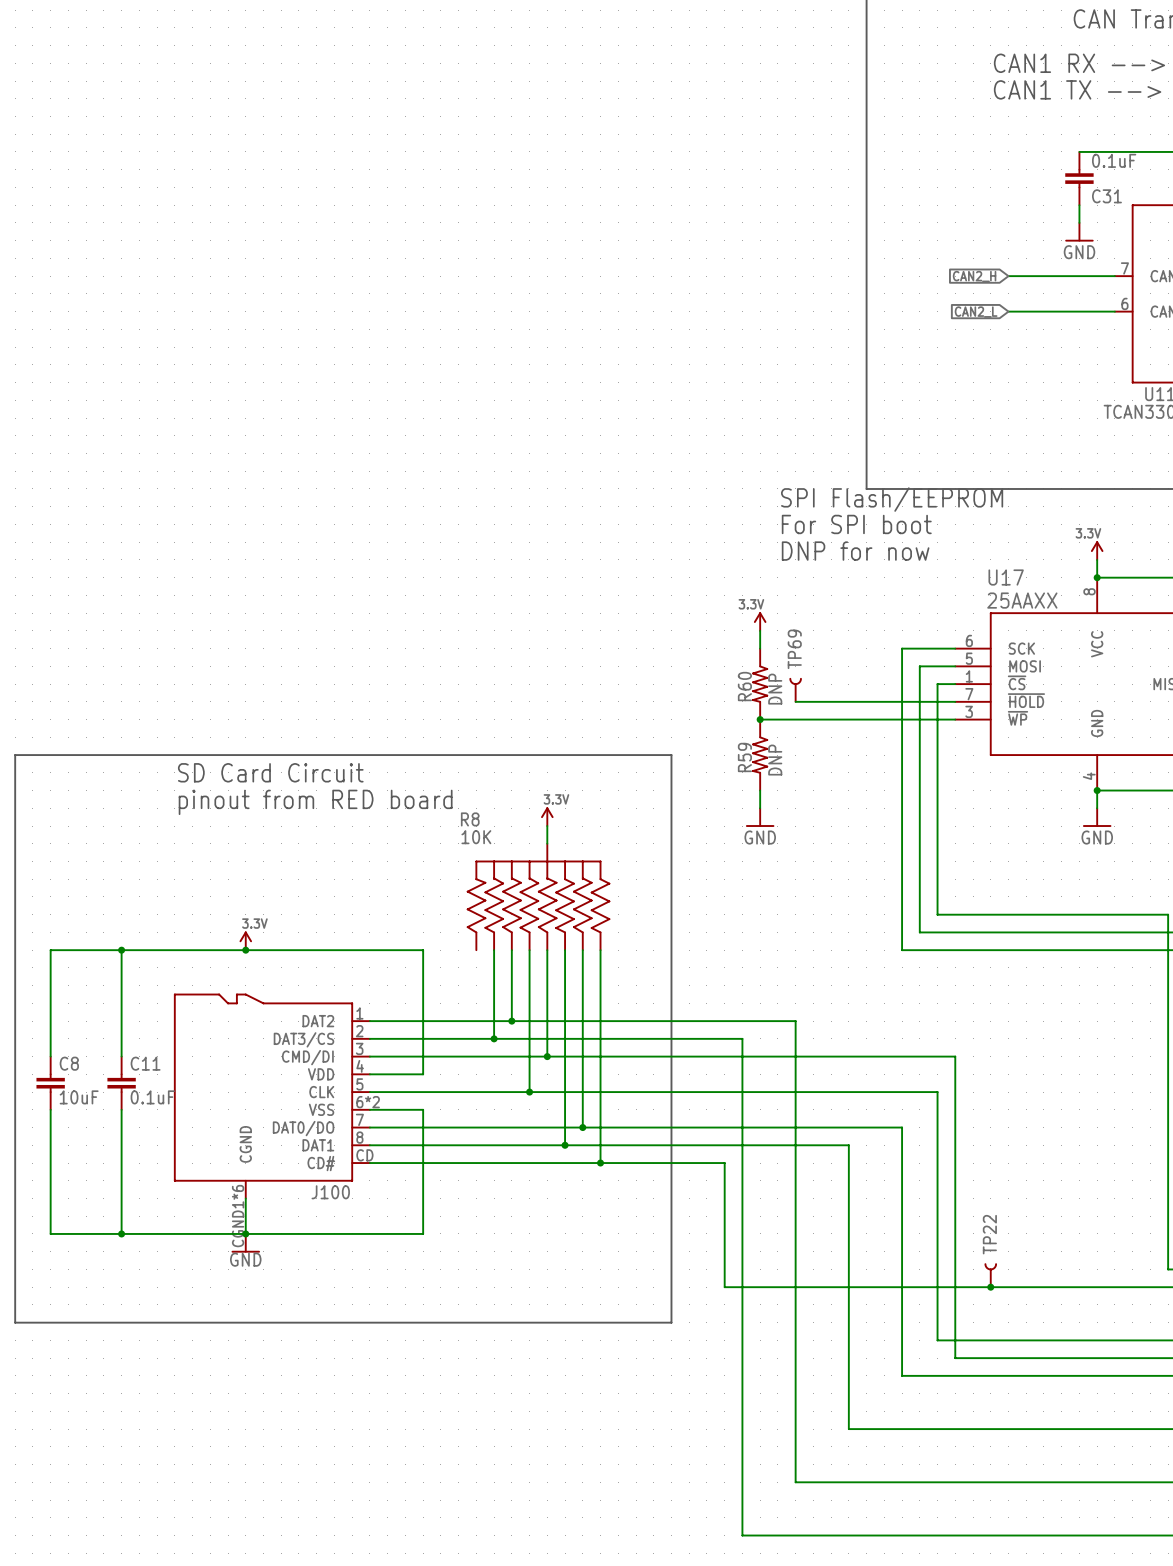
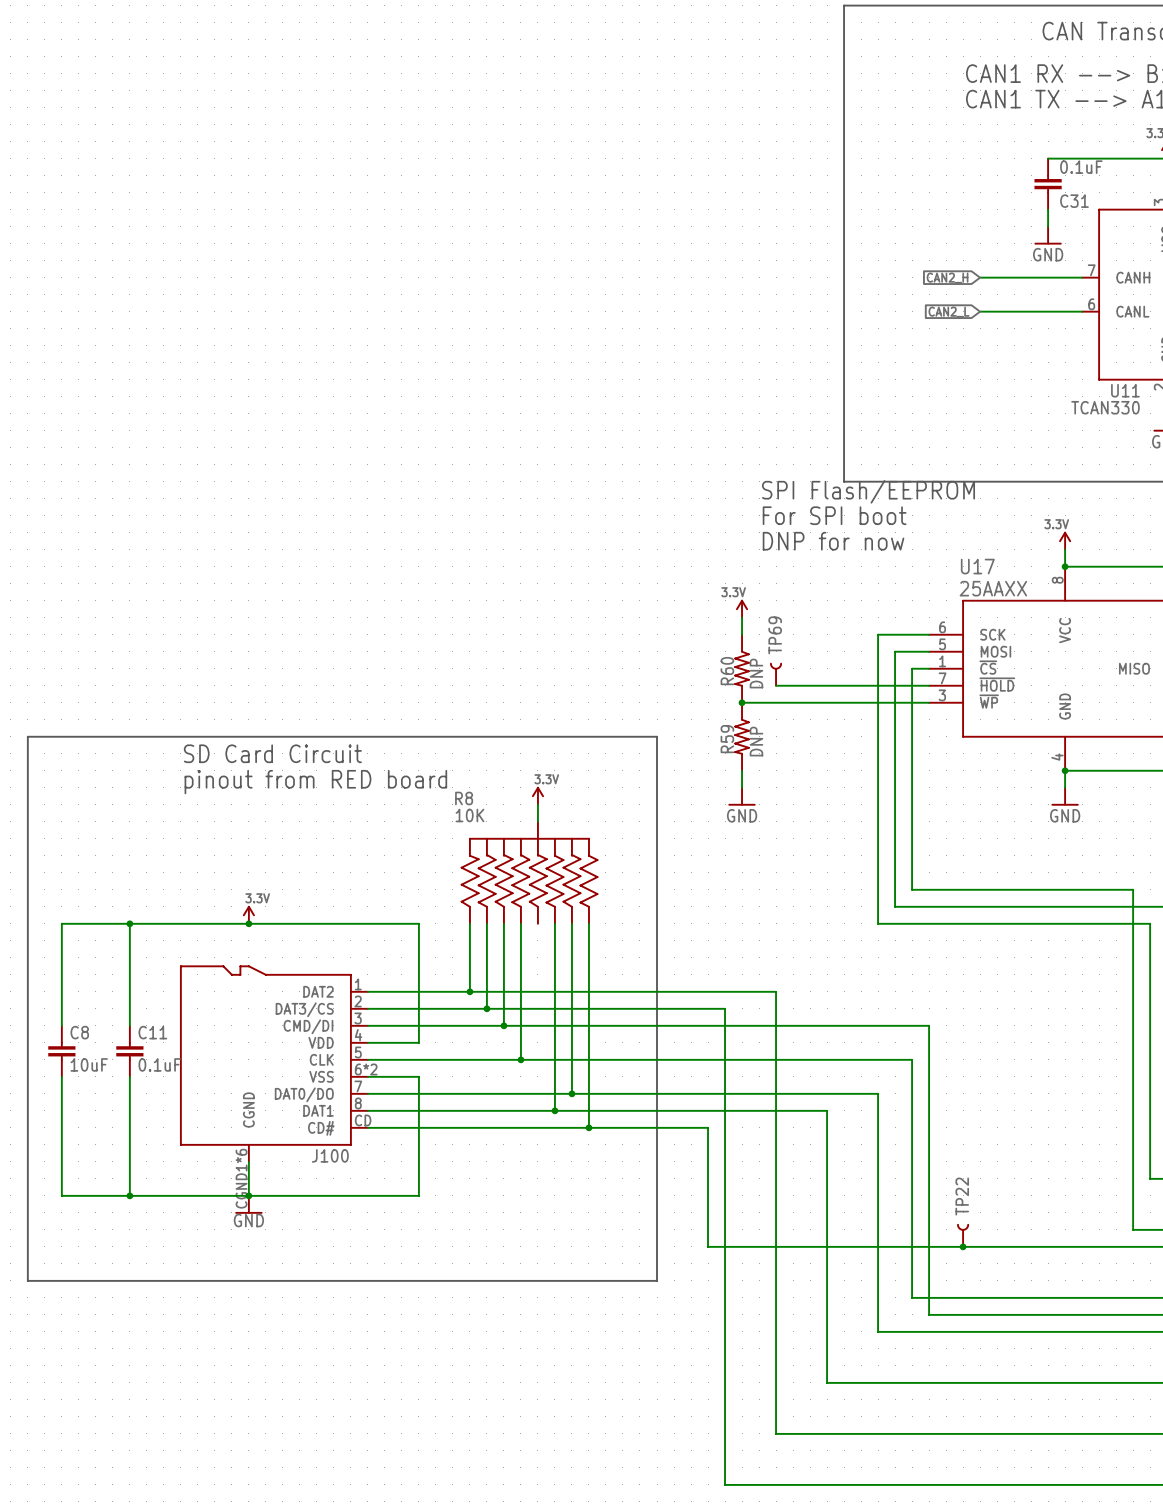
wire: none -> (469, 923) (469, 991)
wire: (547, 950) (547, 1056) -> none
junction: none -> (469, 991)
wire: none -> (503, 991) (503, 1025)
junction: (511, 1021) -> none
junction: none -> (503, 1025)
junction: (547, 1056) -> none

